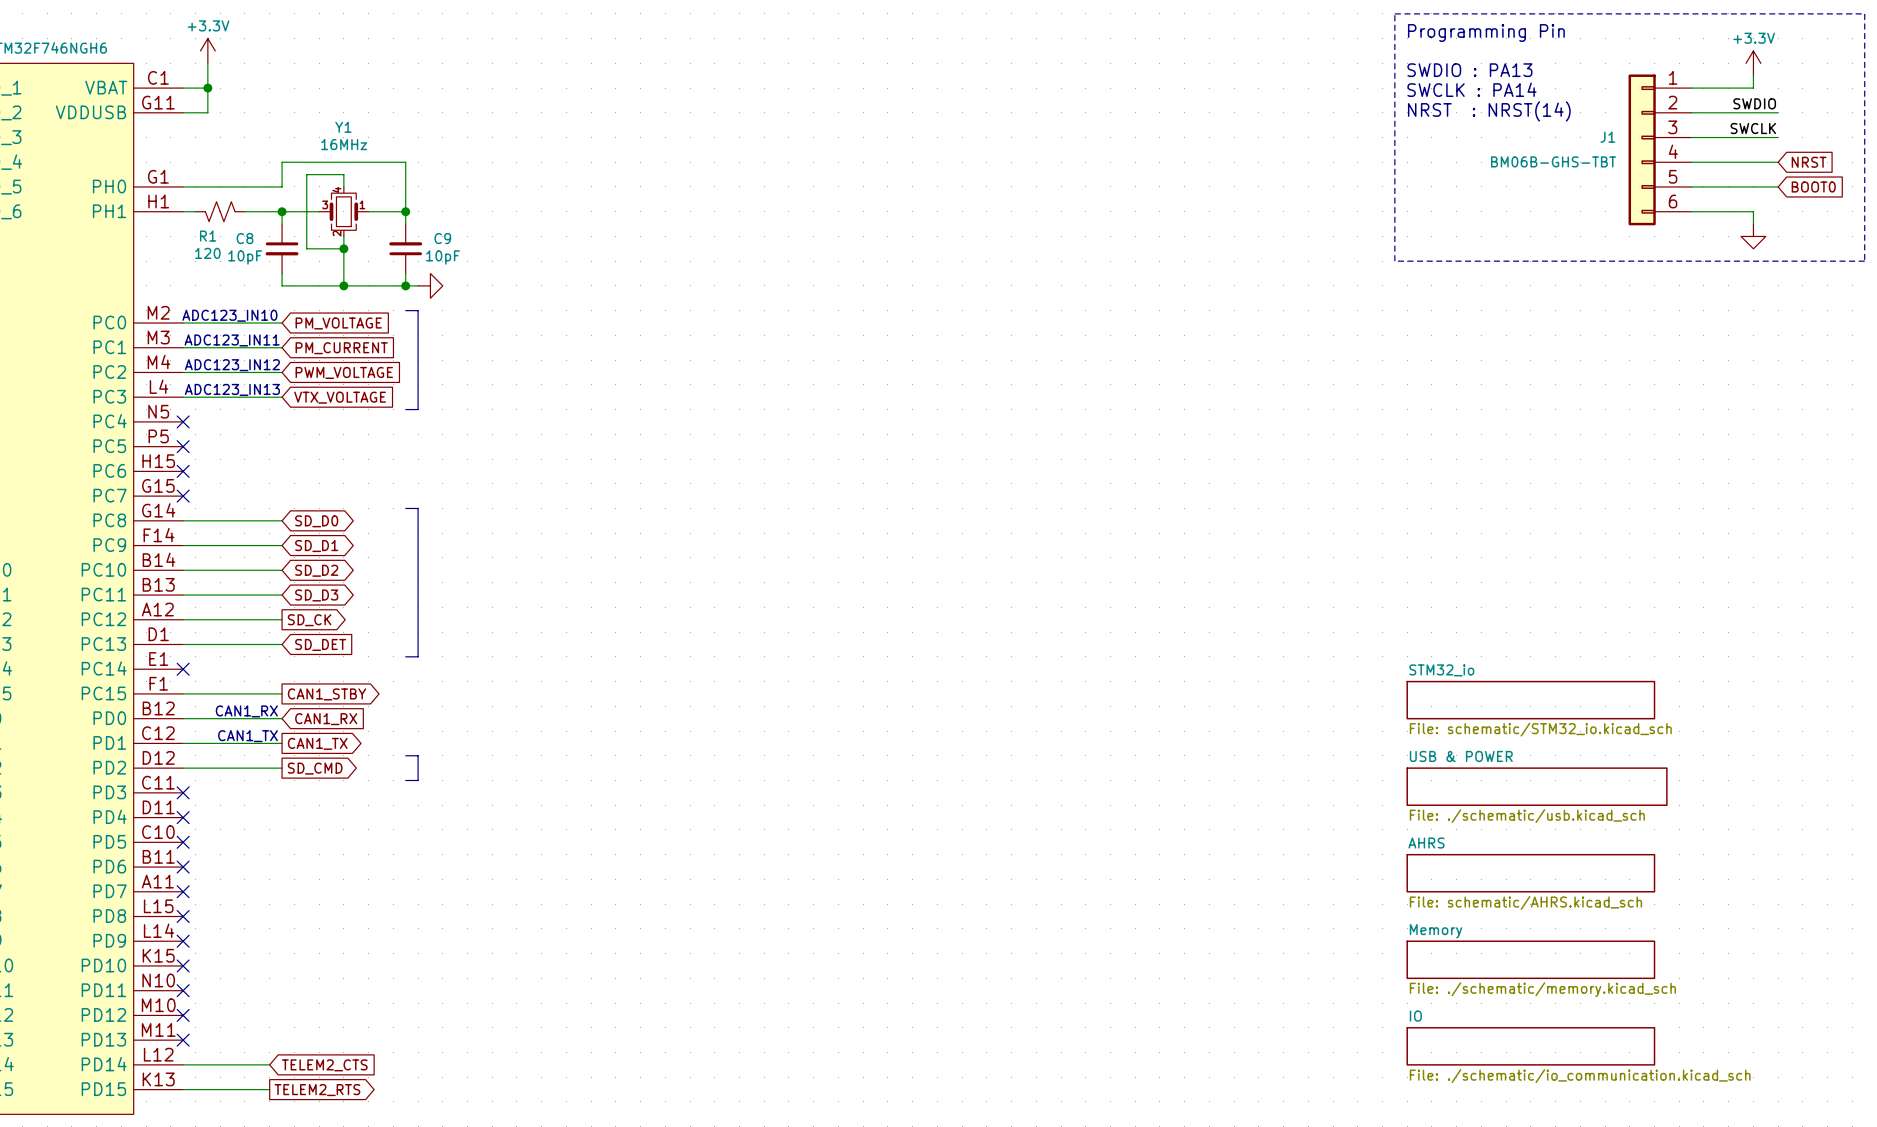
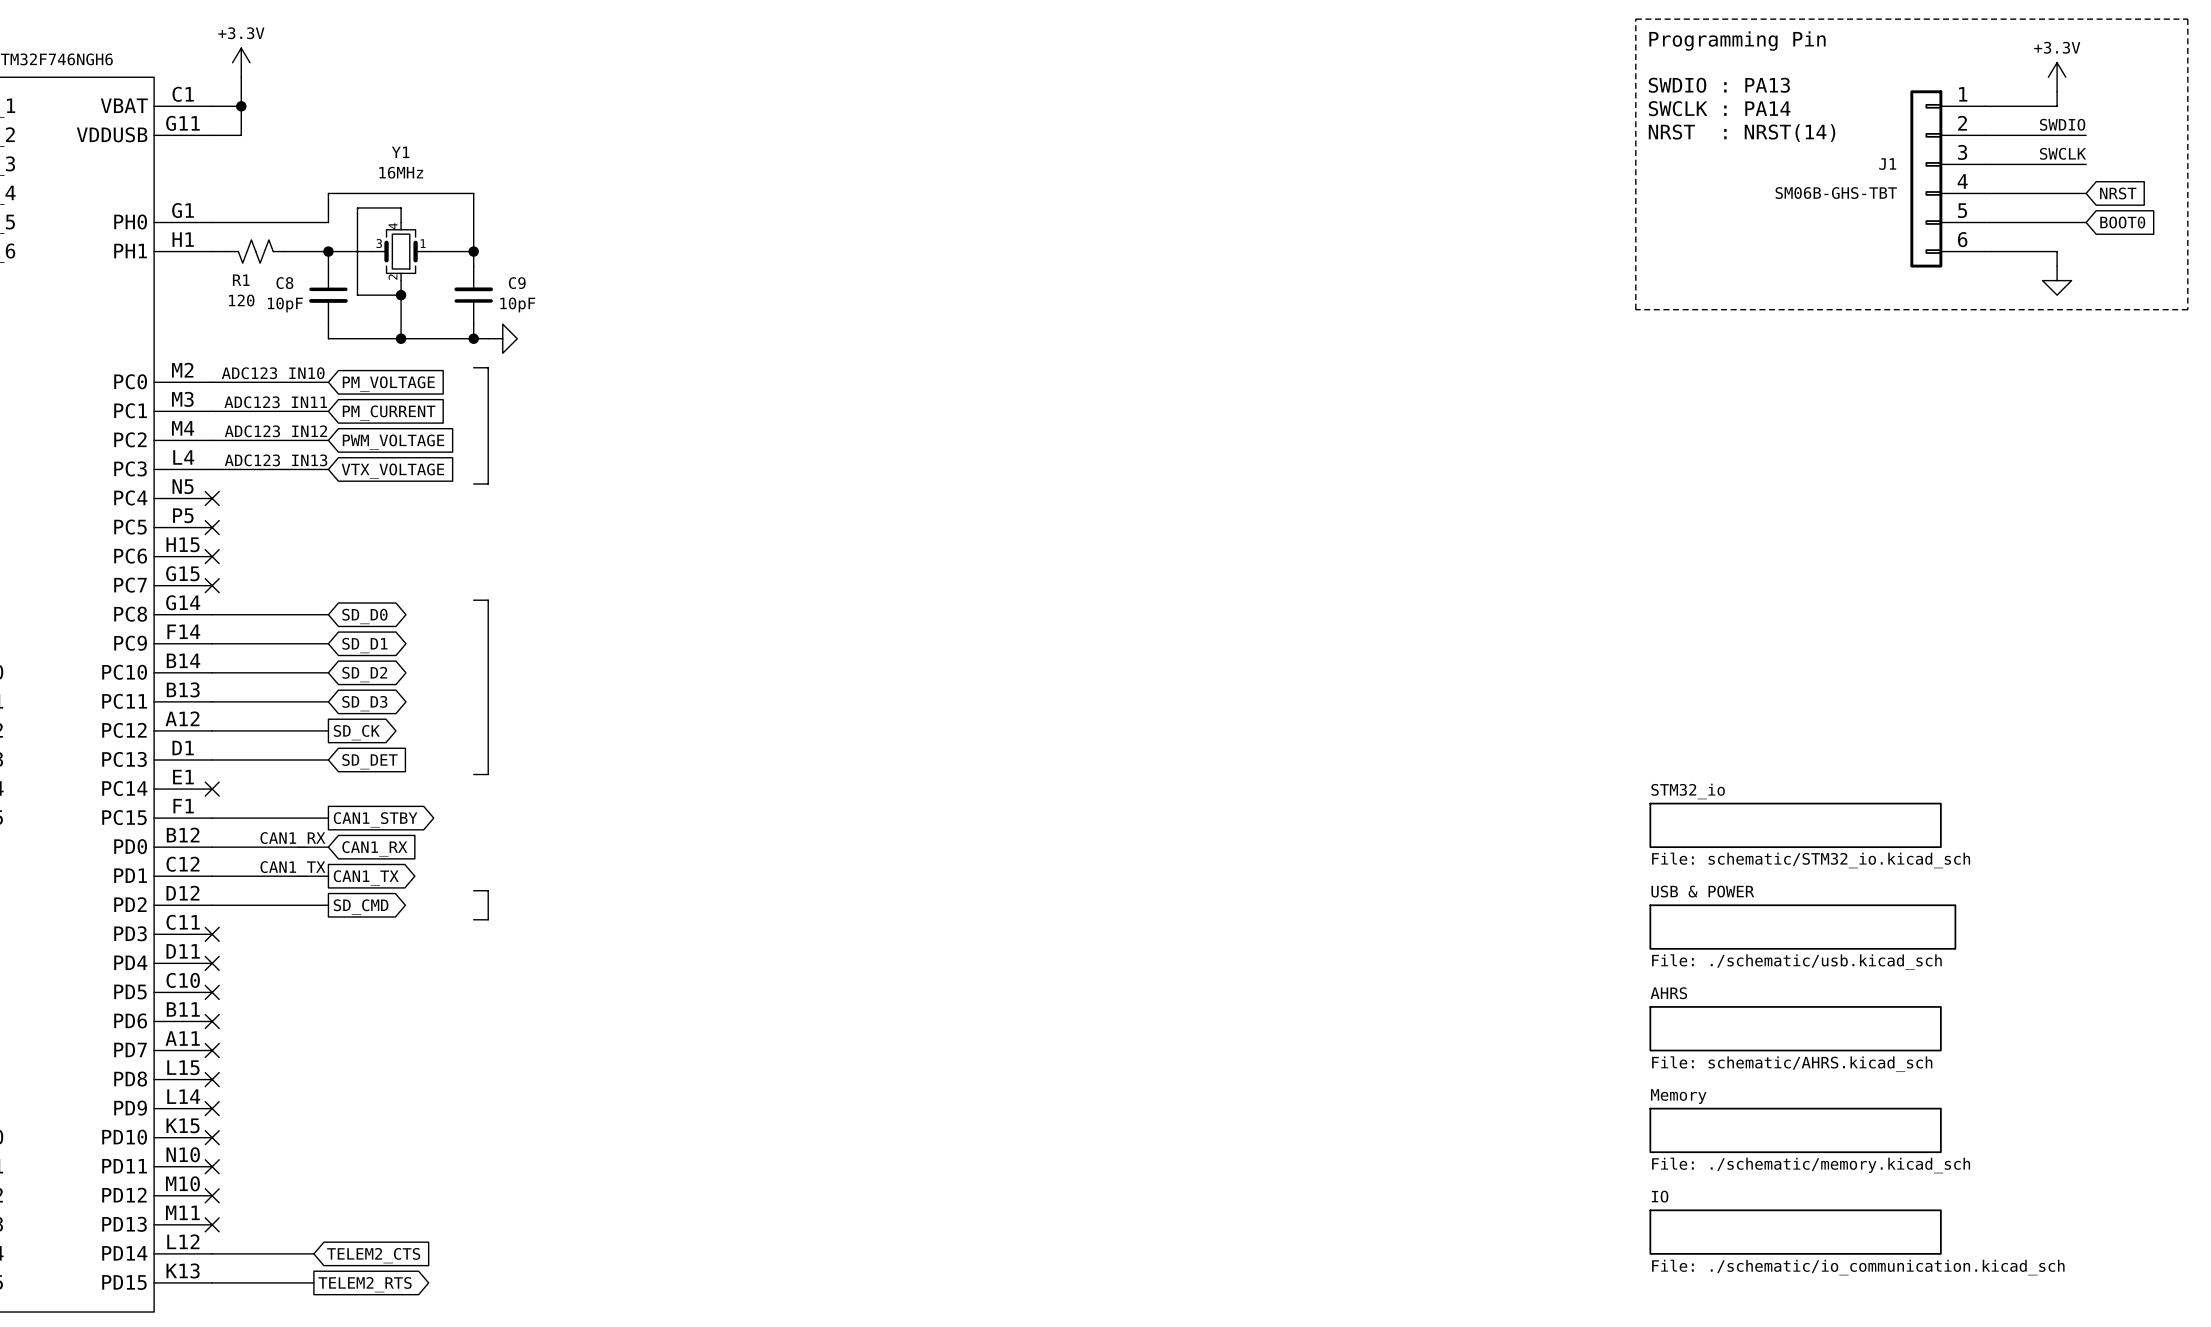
J1 value: BM06B-GHS-TBT (1553, 161) -> SM06B-GHS-TBT (1836, 193)

